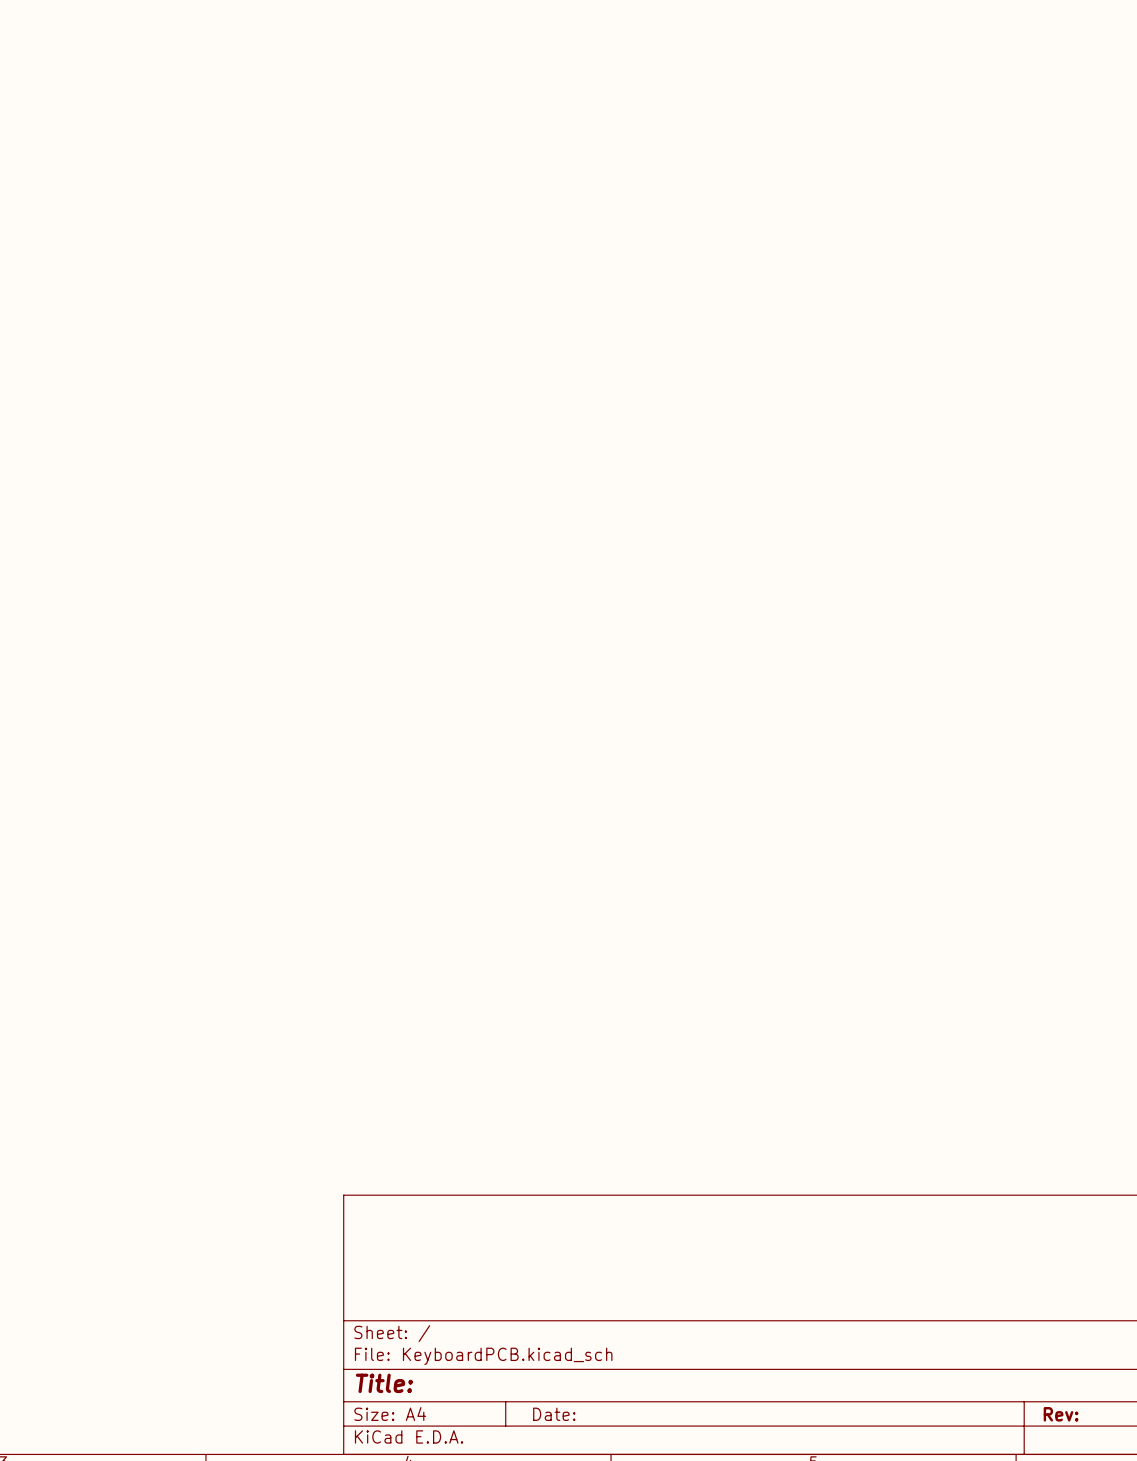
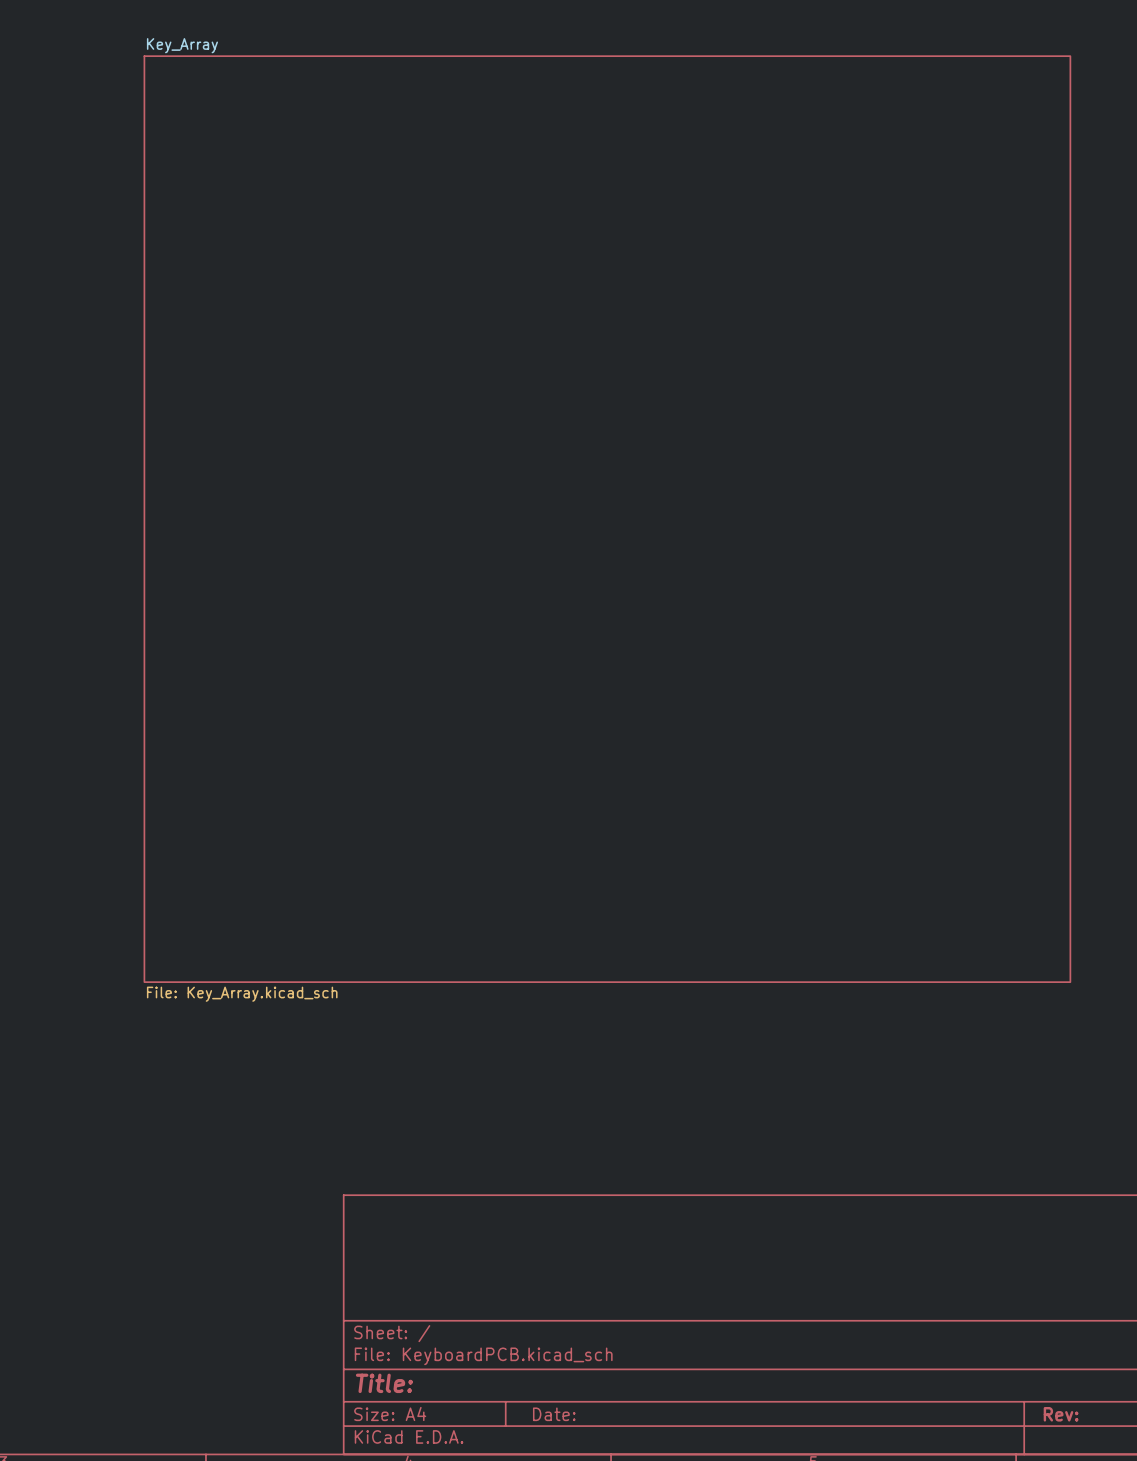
sheet Key_Array: none -> File: Key_Array.kicad_sch (607, 519)

